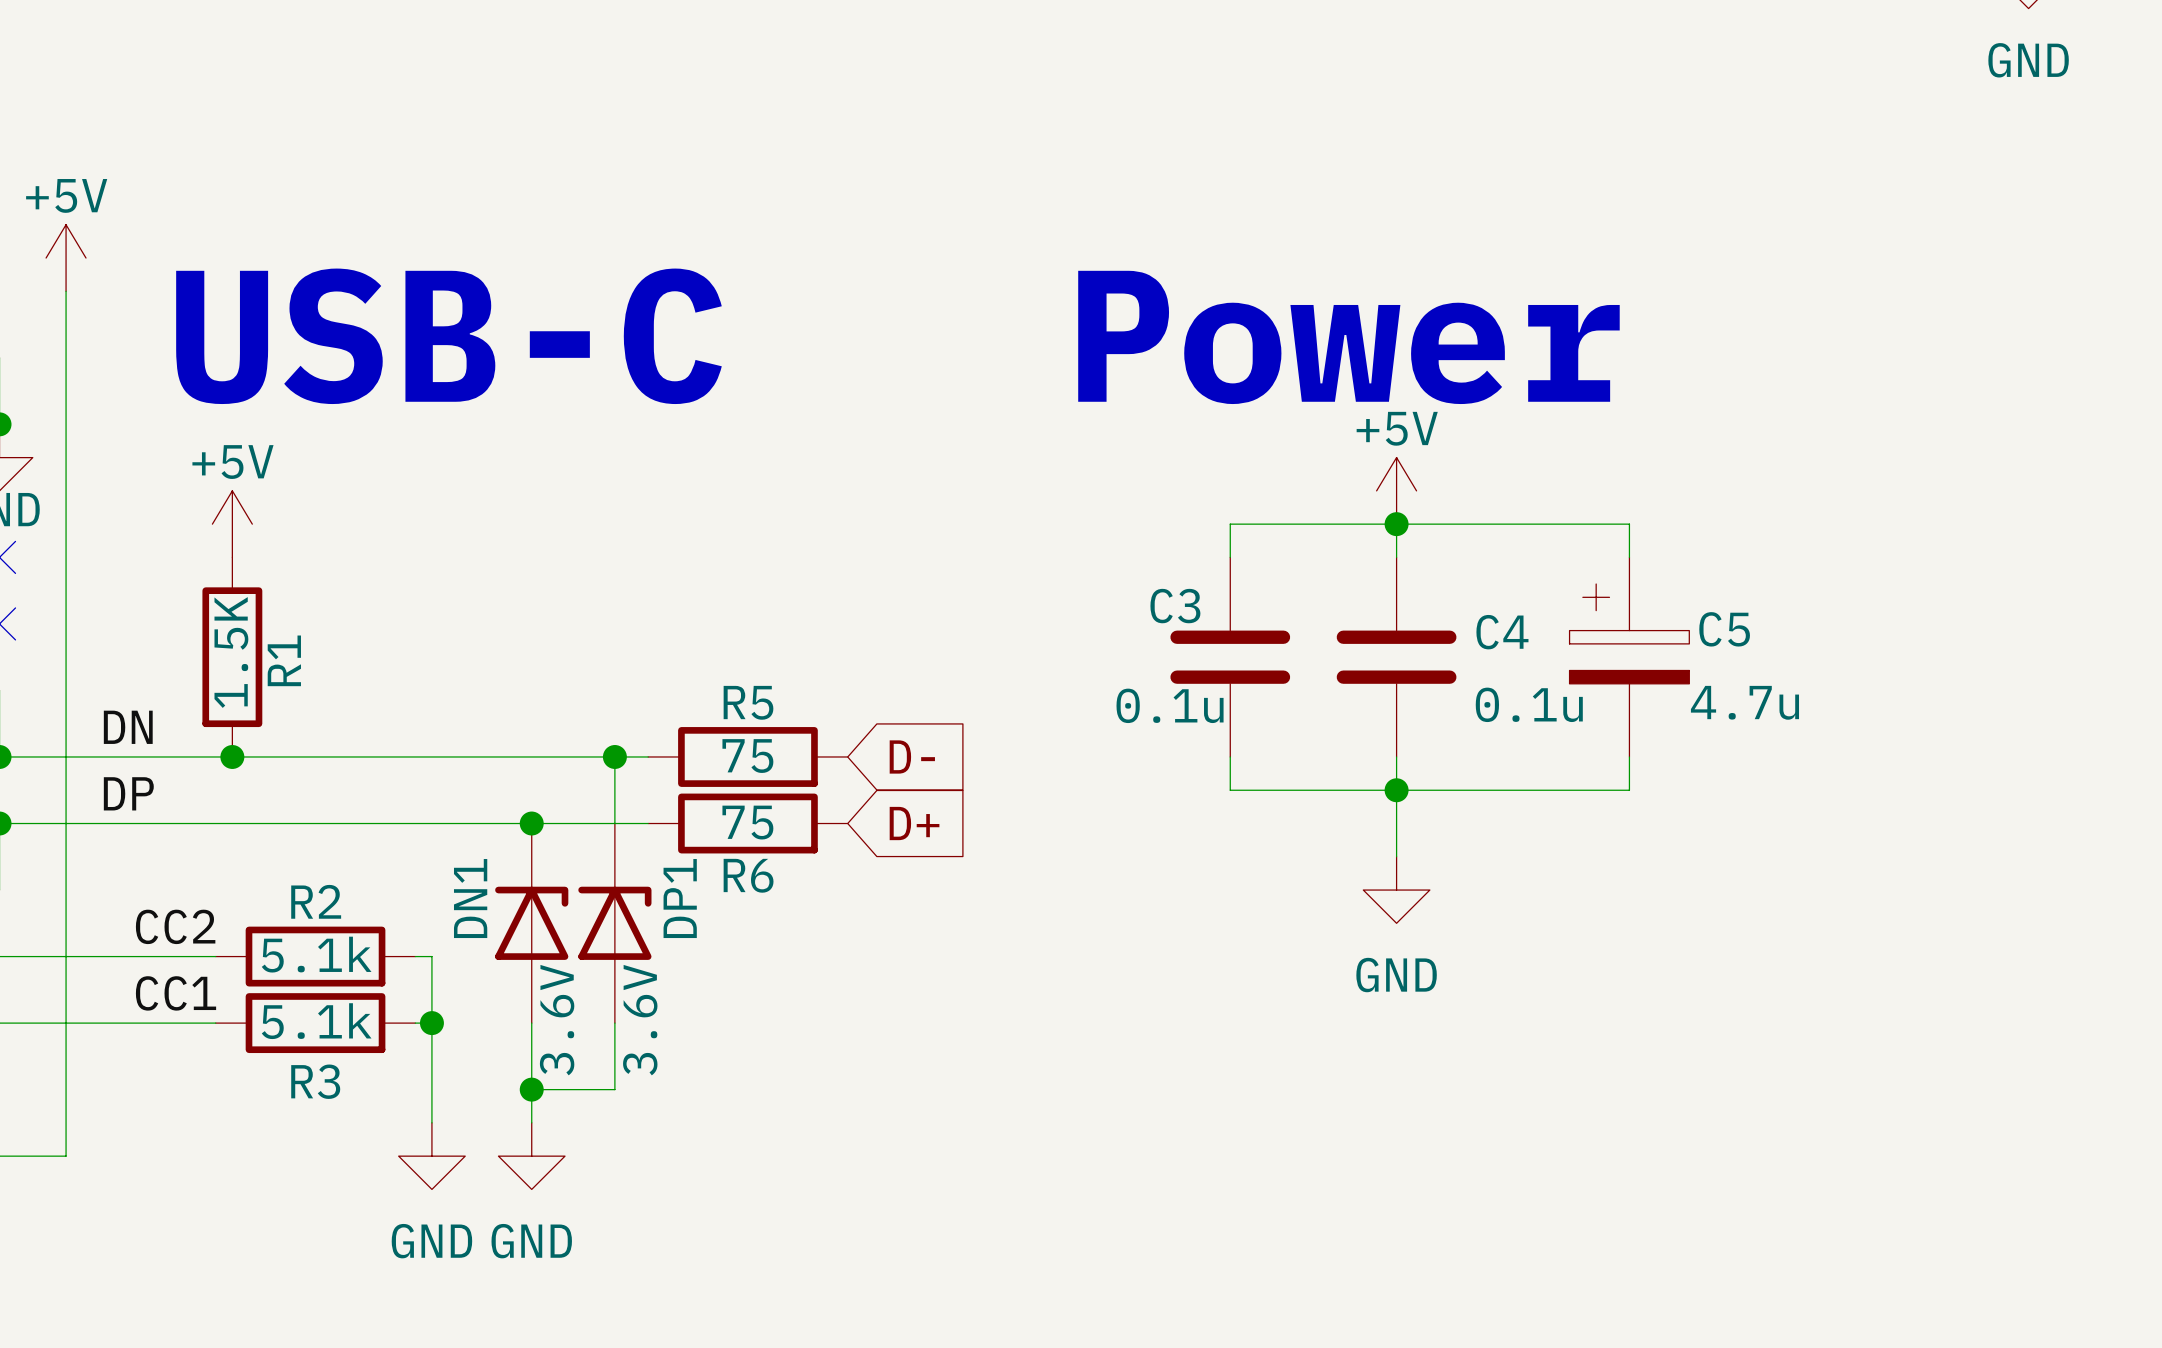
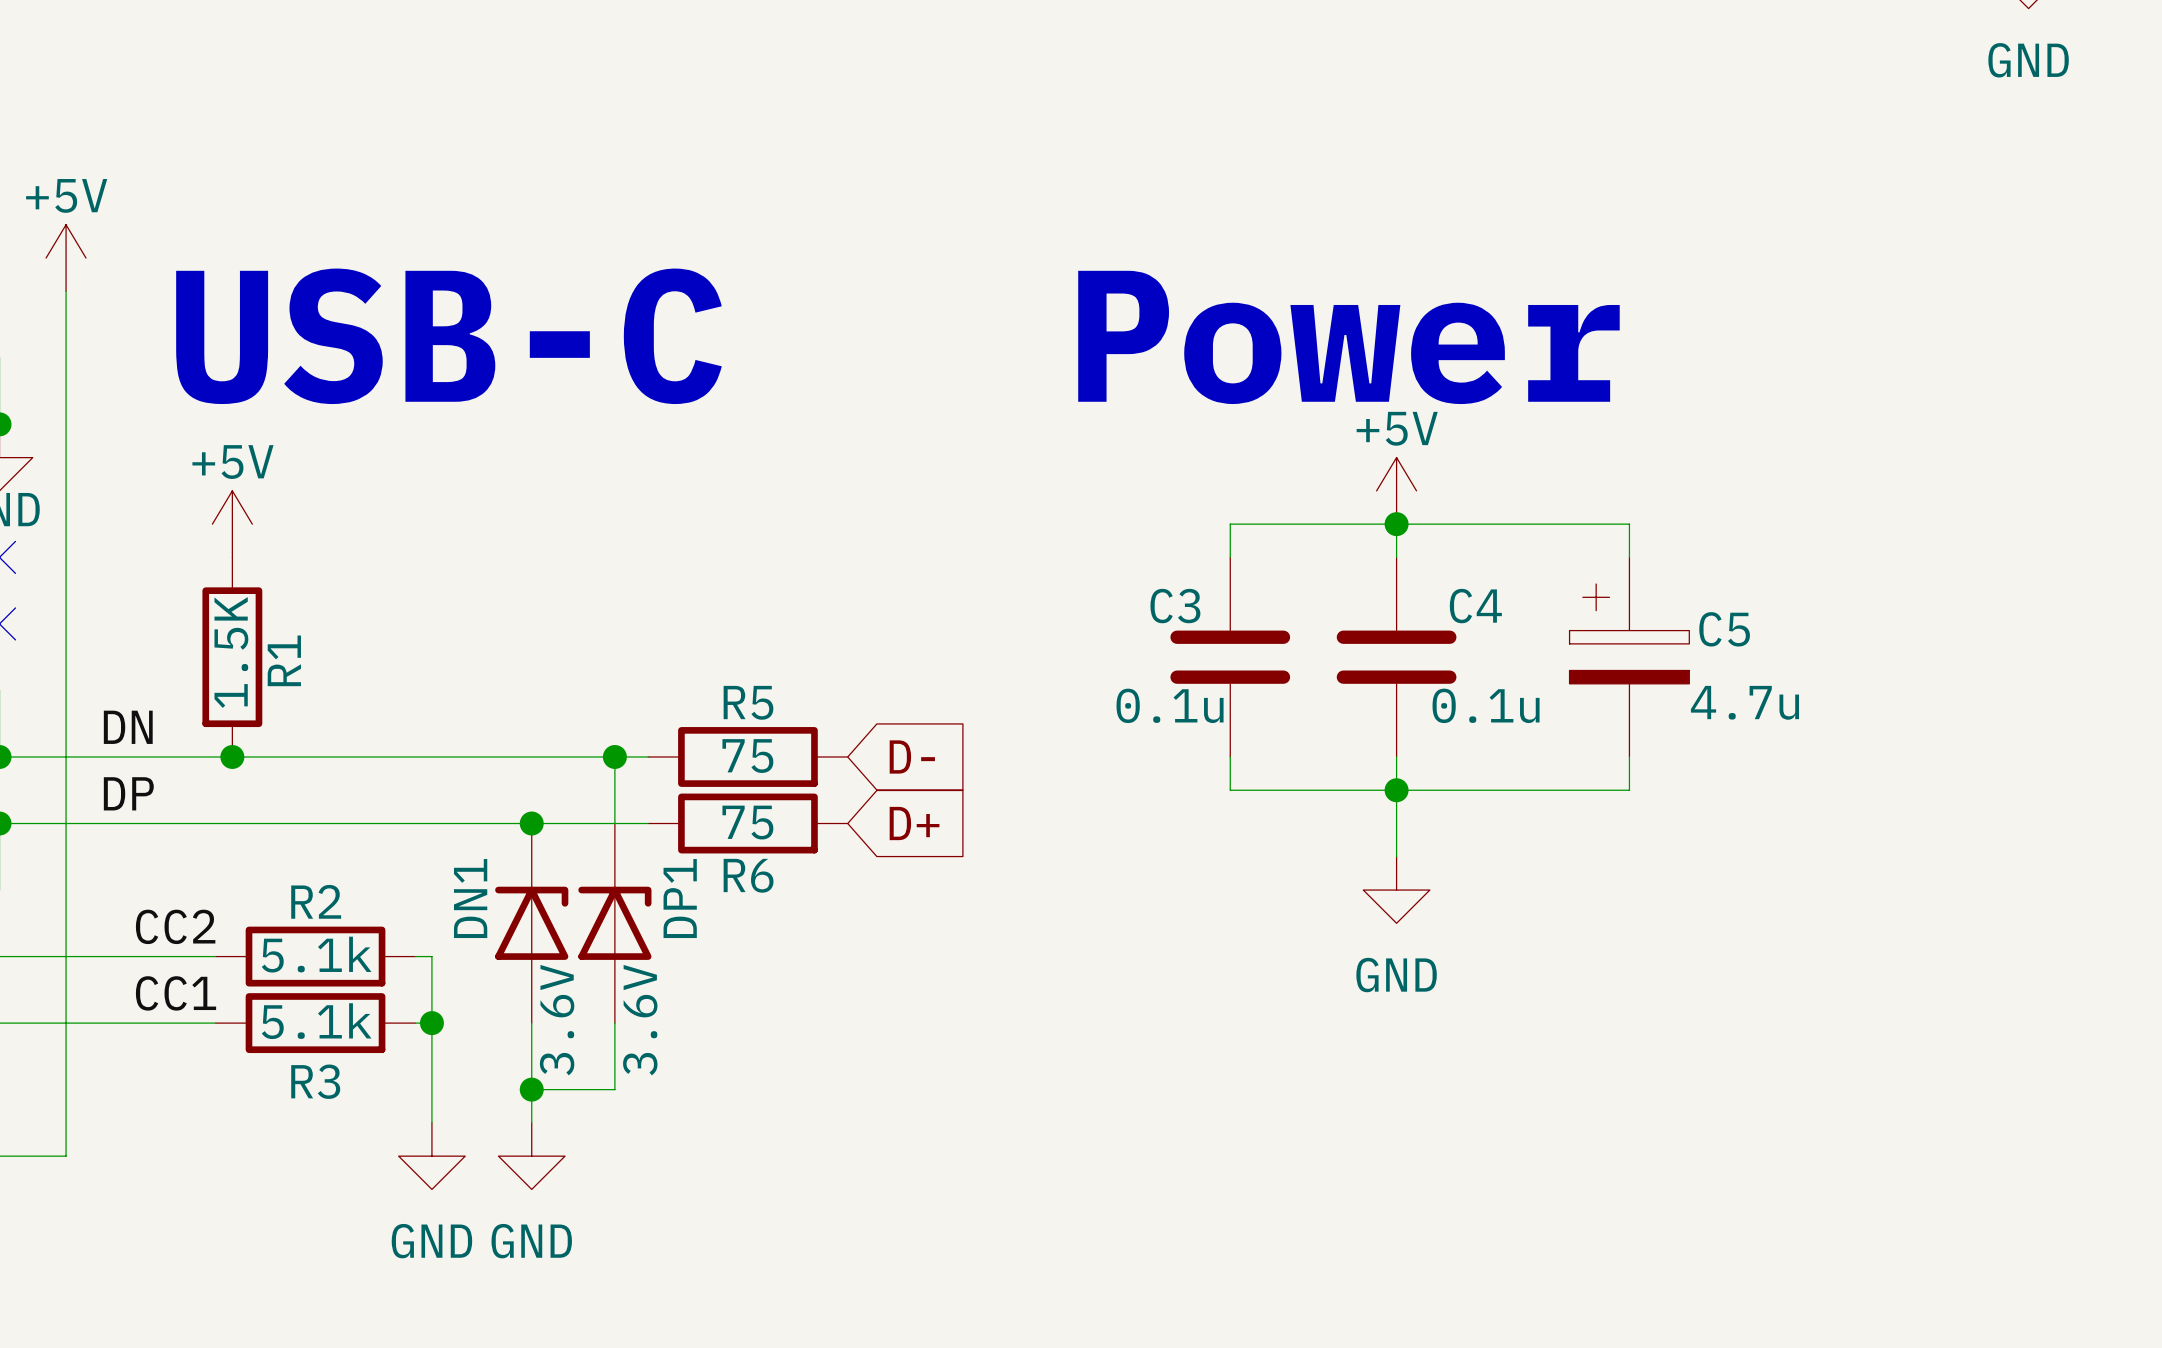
C4 name position: C4 (1502, 632) -> C4 (1475, 606)
C4 value position: 0.1u (1529, 704) -> 0.1u (1486, 705)

